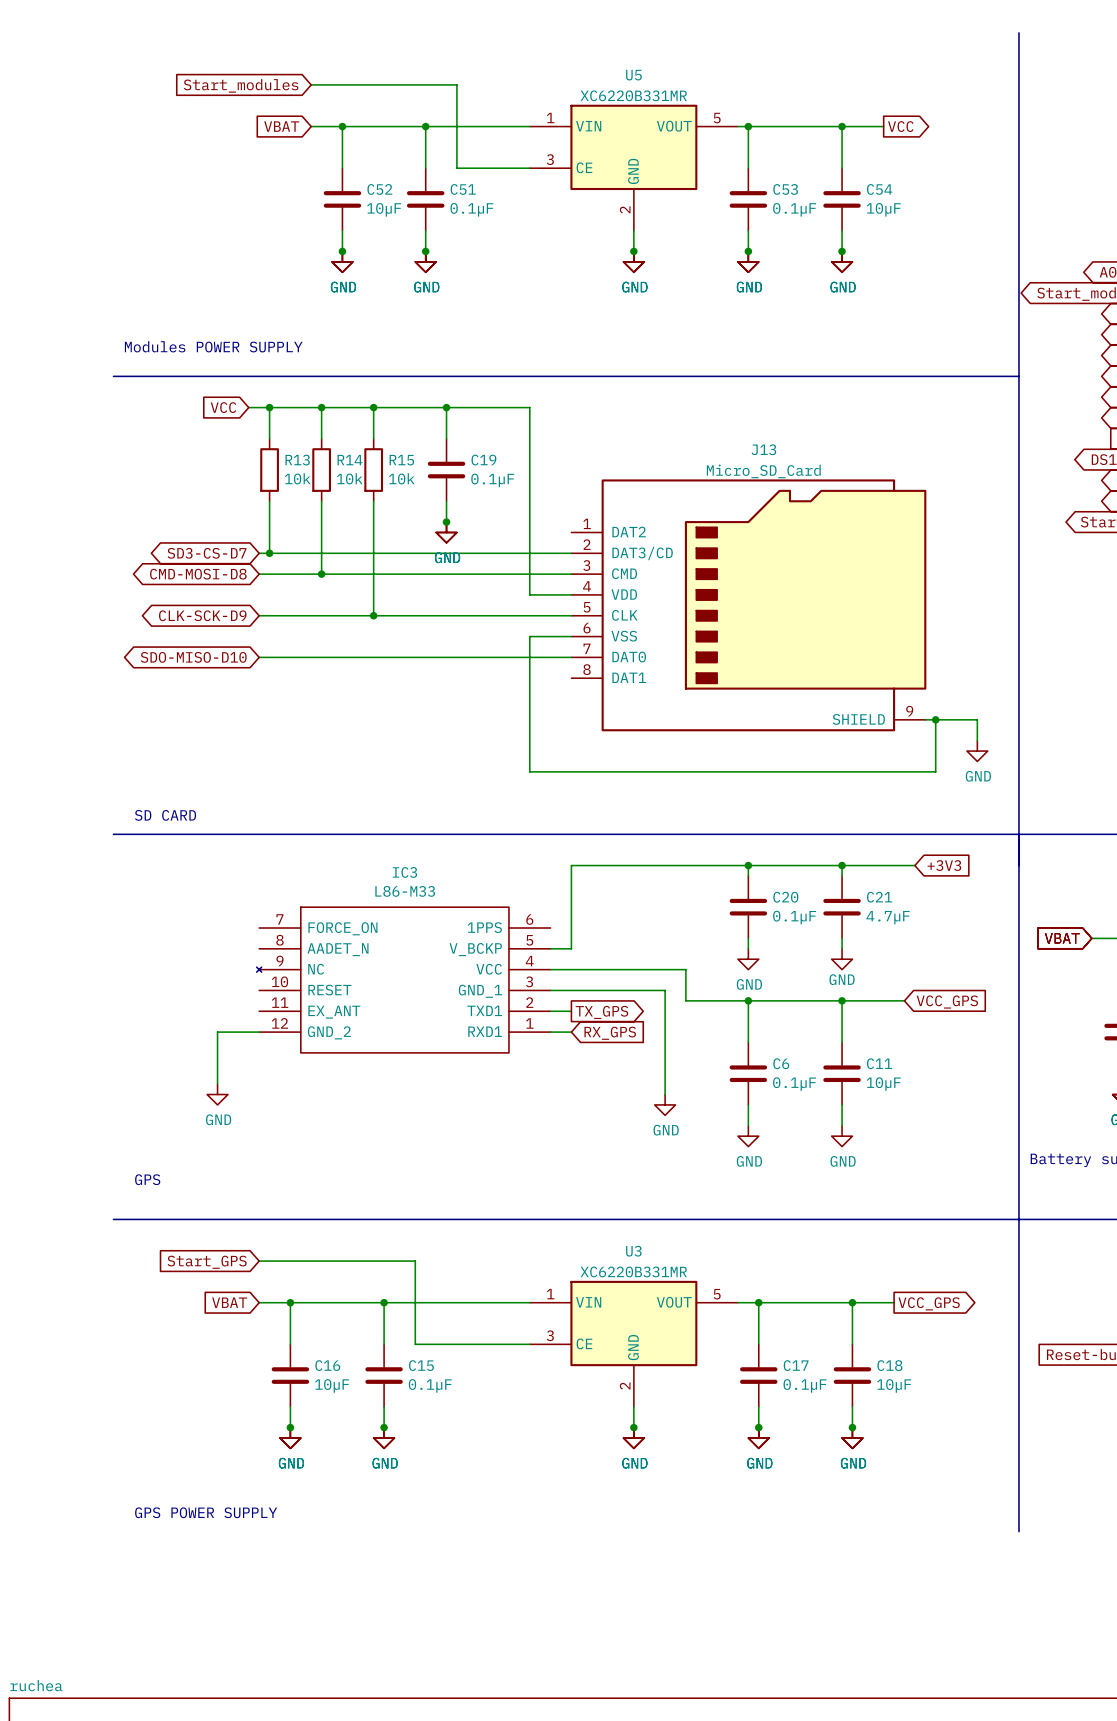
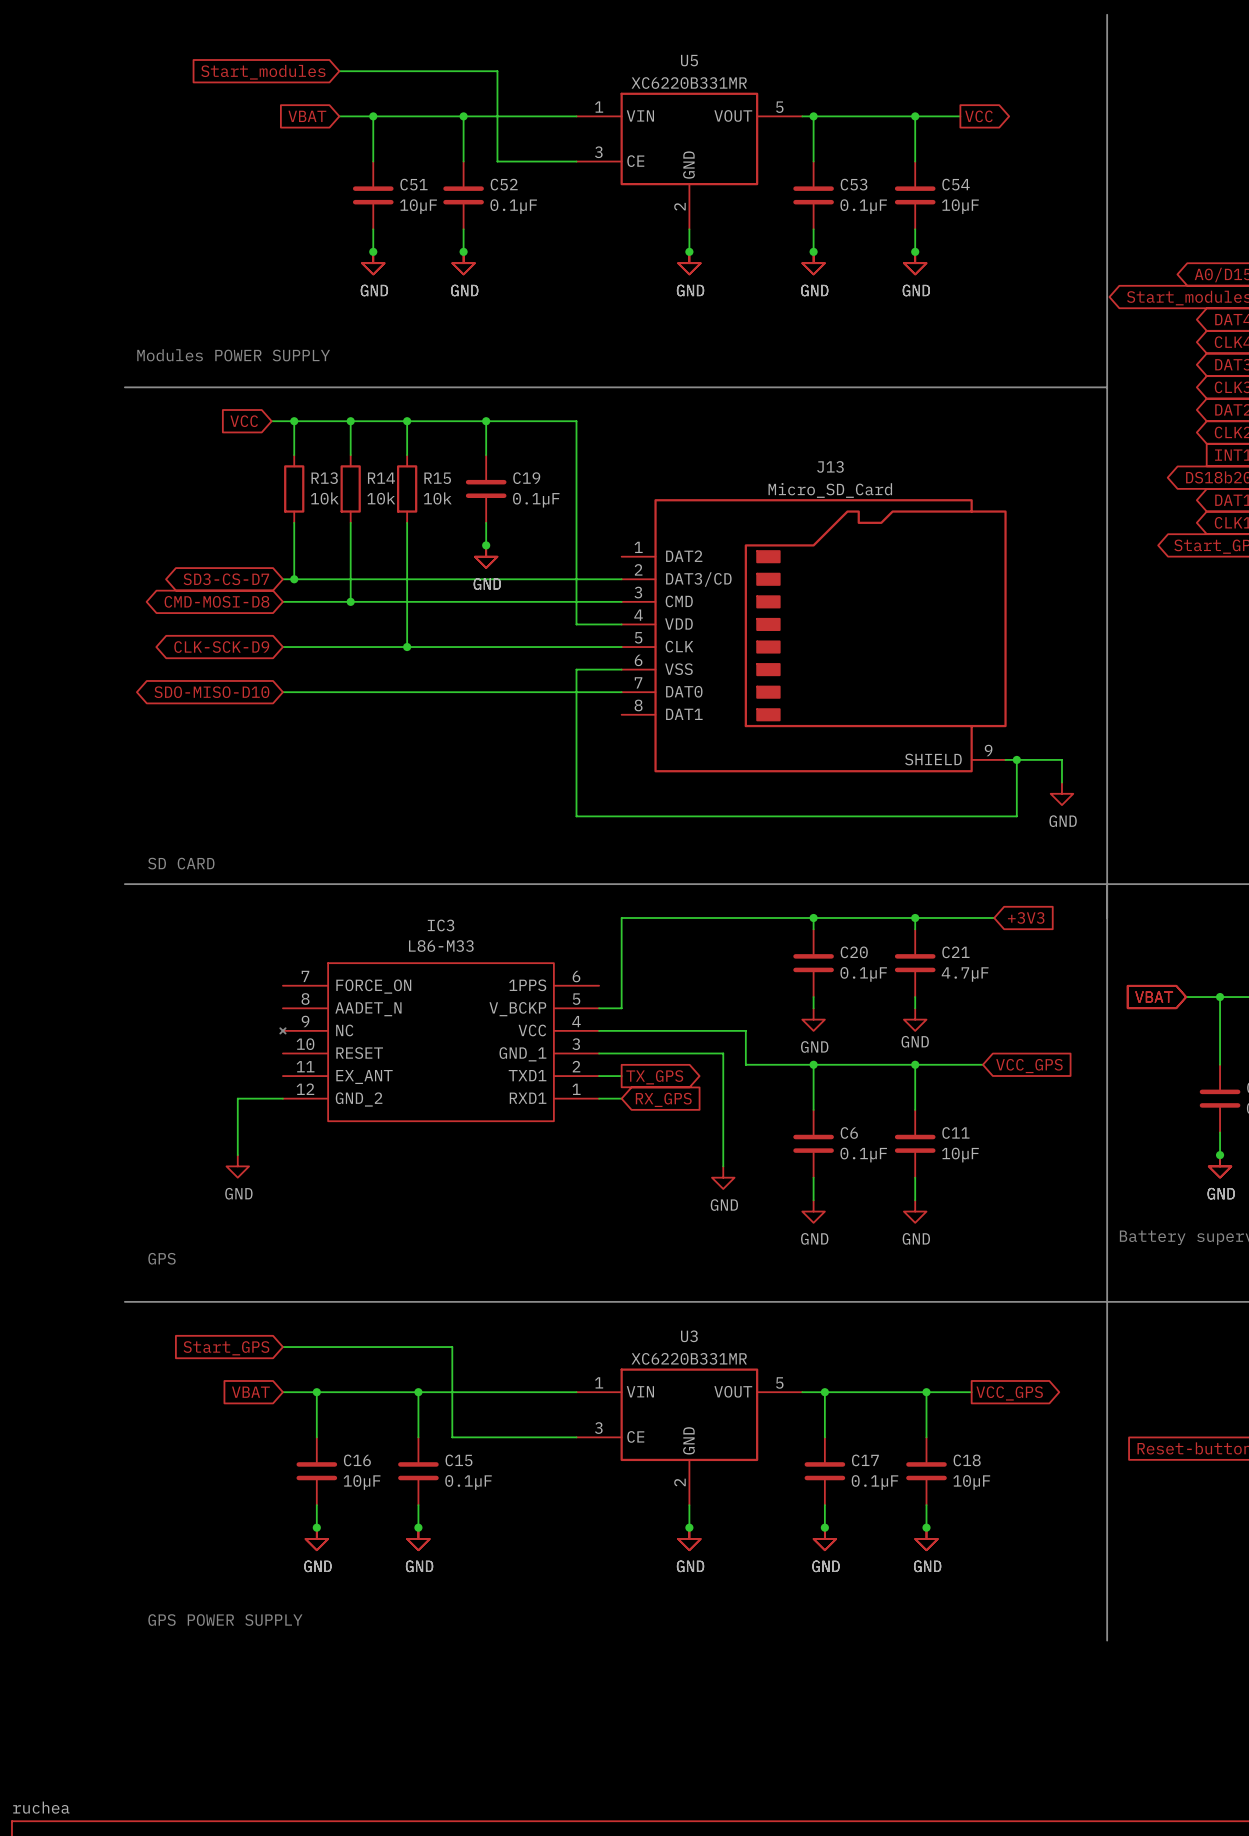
C52 name: C52 (379, 189) -> C51 (413, 184)
C51 name: C51 (463, 189) -> C52 (504, 184)

